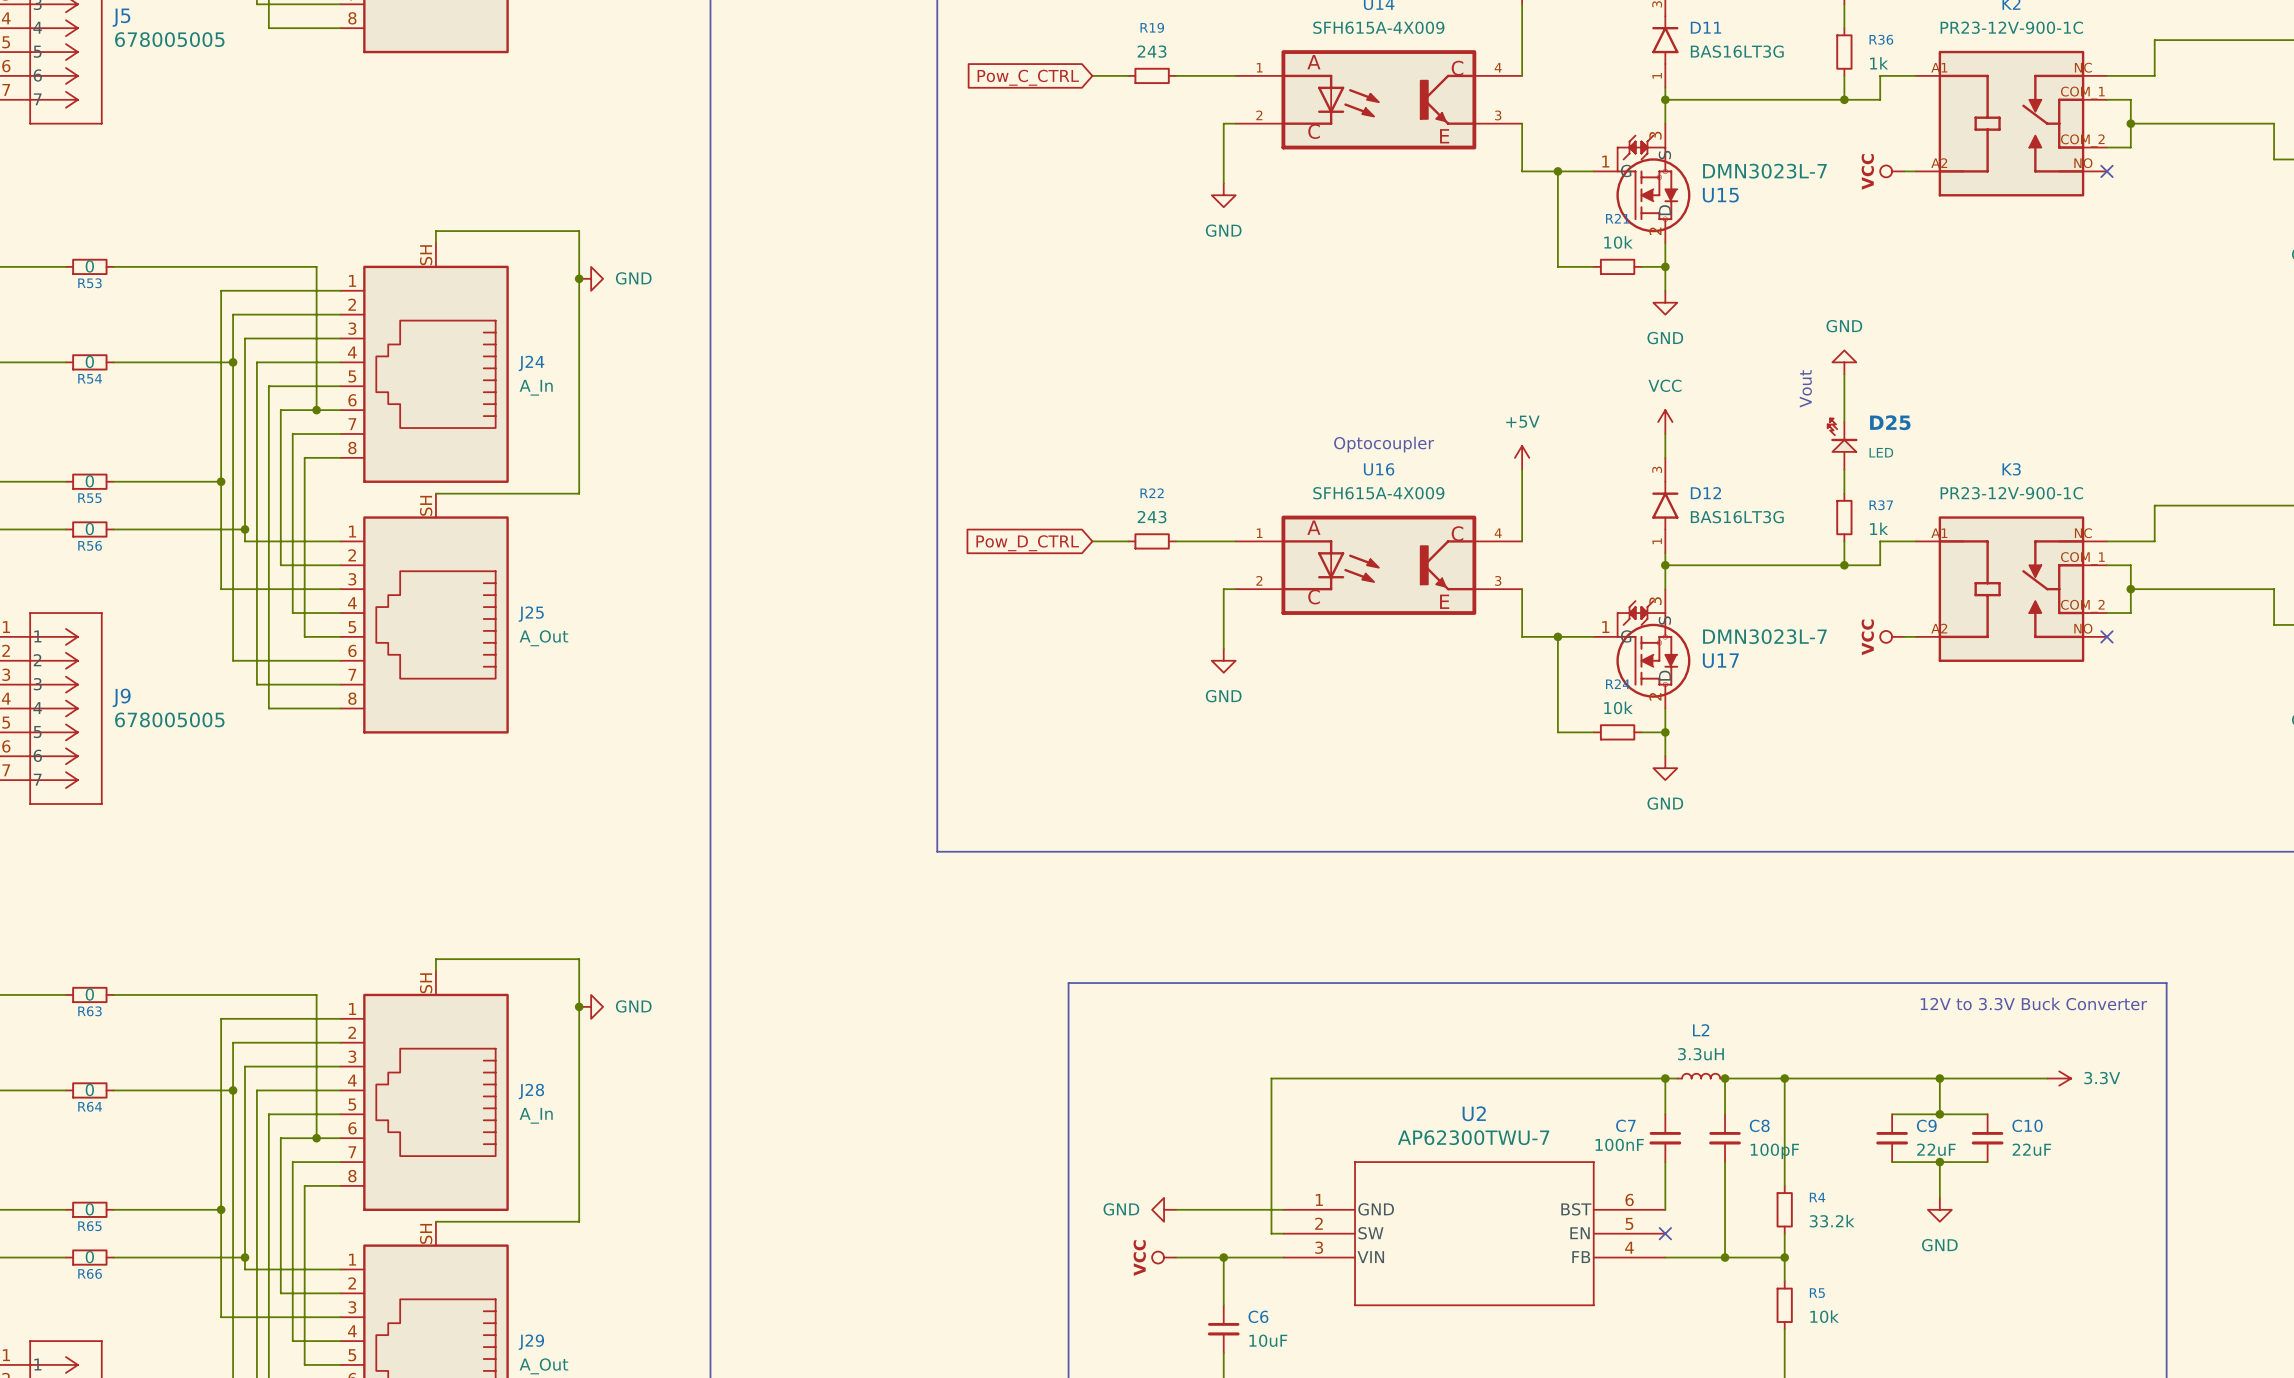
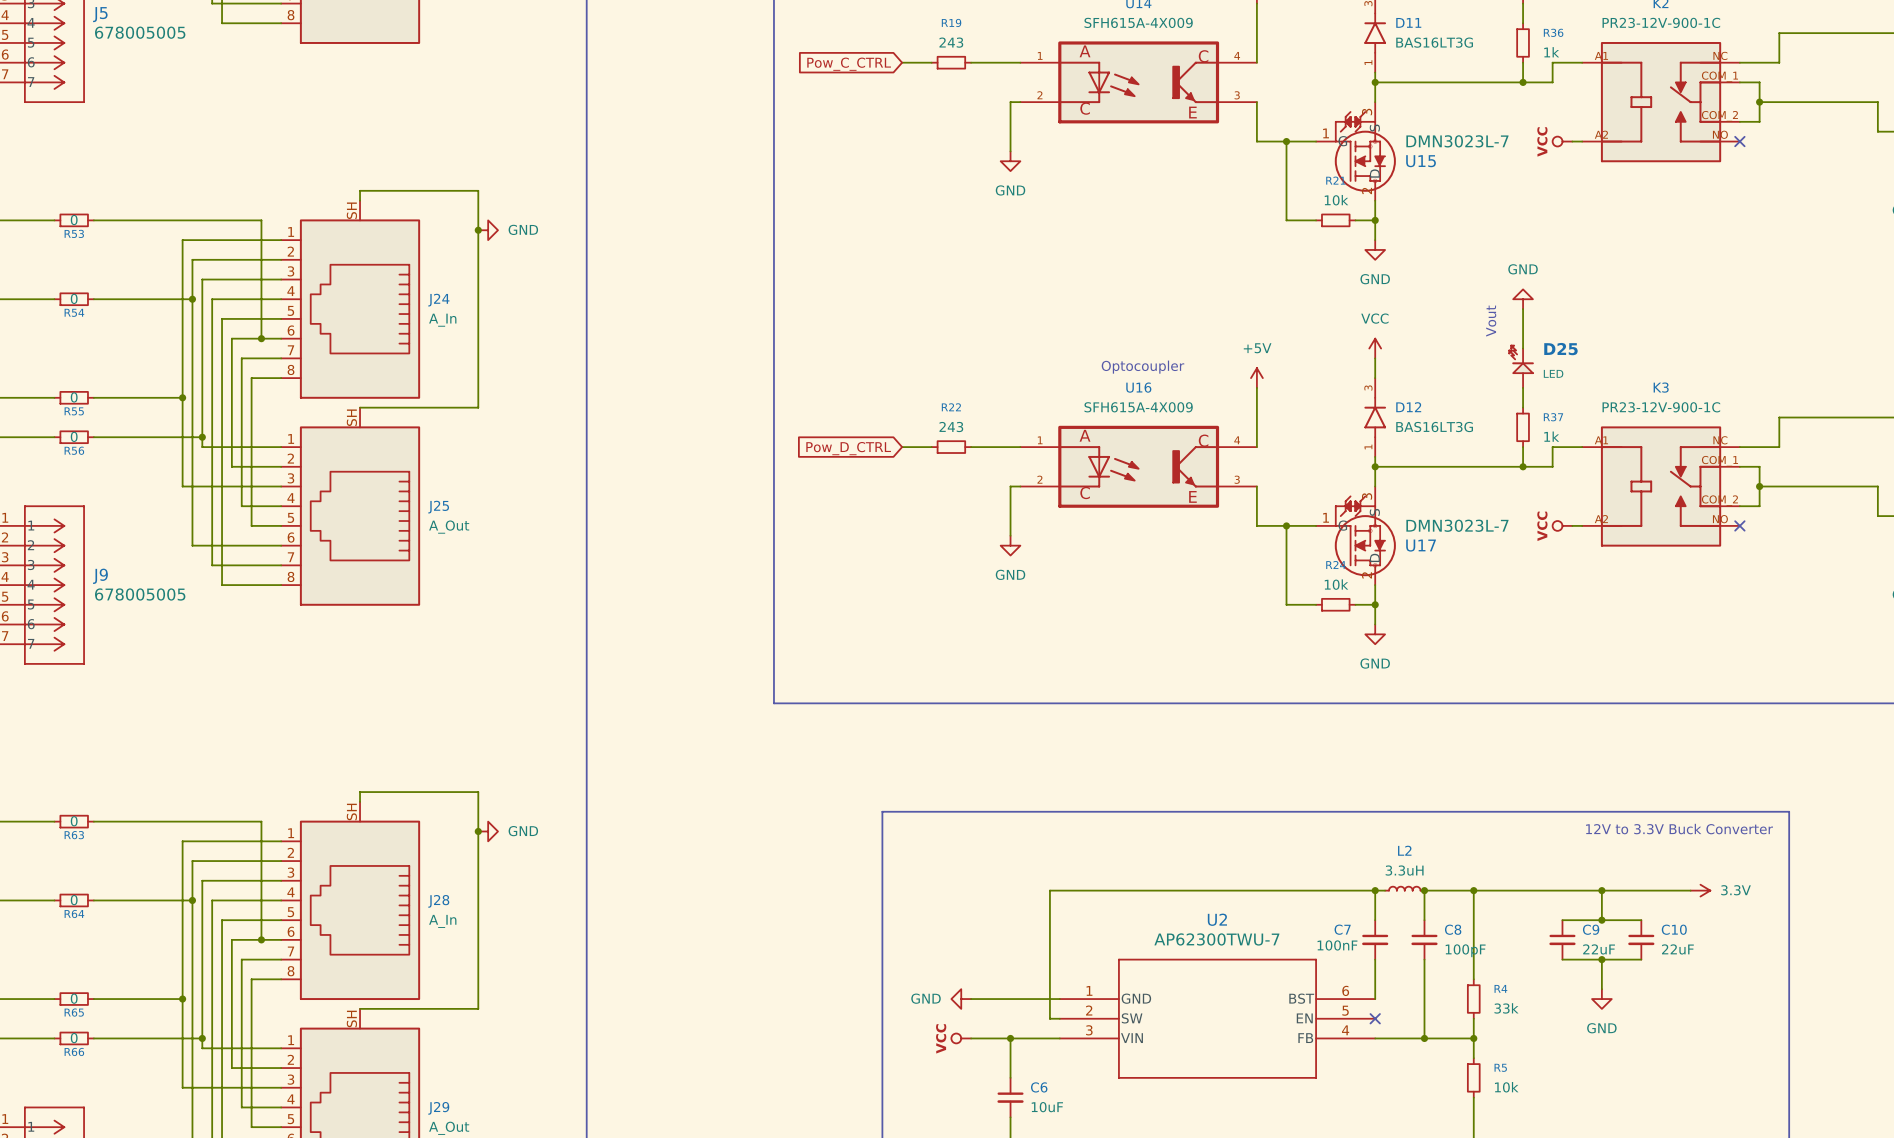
R4 value: 33.2k (1832, 1221) -> 33k (1506, 1008)

